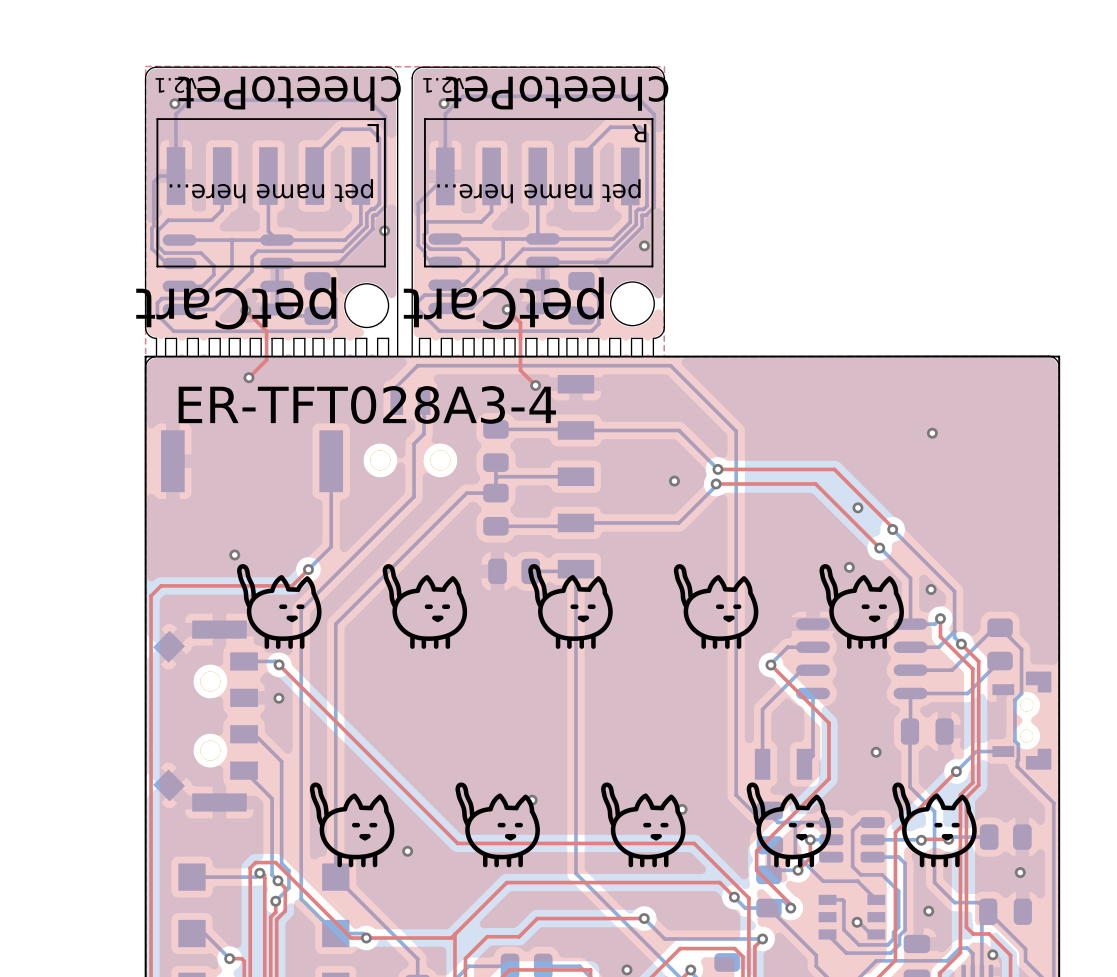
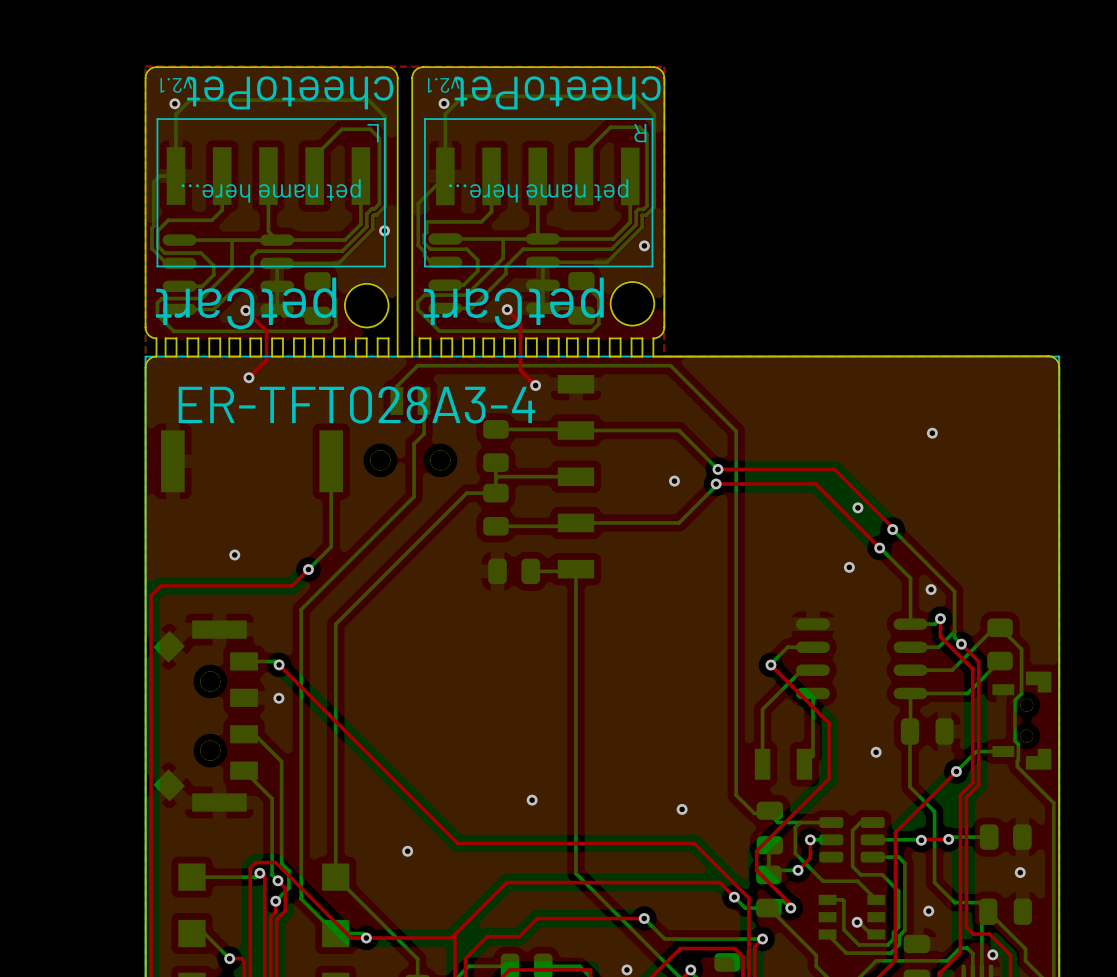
drawing: [237, 564, 322, 649] -> none
drawing: [382, 564, 468, 649] -> none
drawing: [528, 564, 613, 649] -> none
drawing: [673, 564, 759, 649] -> none
drawing: [819, 564, 904, 649] -> none
drawing: [309, 782, 395, 868] -> none
drawing: [455, 782, 540, 868] -> none
drawing: [601, 782, 686, 868] -> none
drawing: [746, 782, 832, 868] -> none
drawing: [892, 782, 977, 868] -> none

